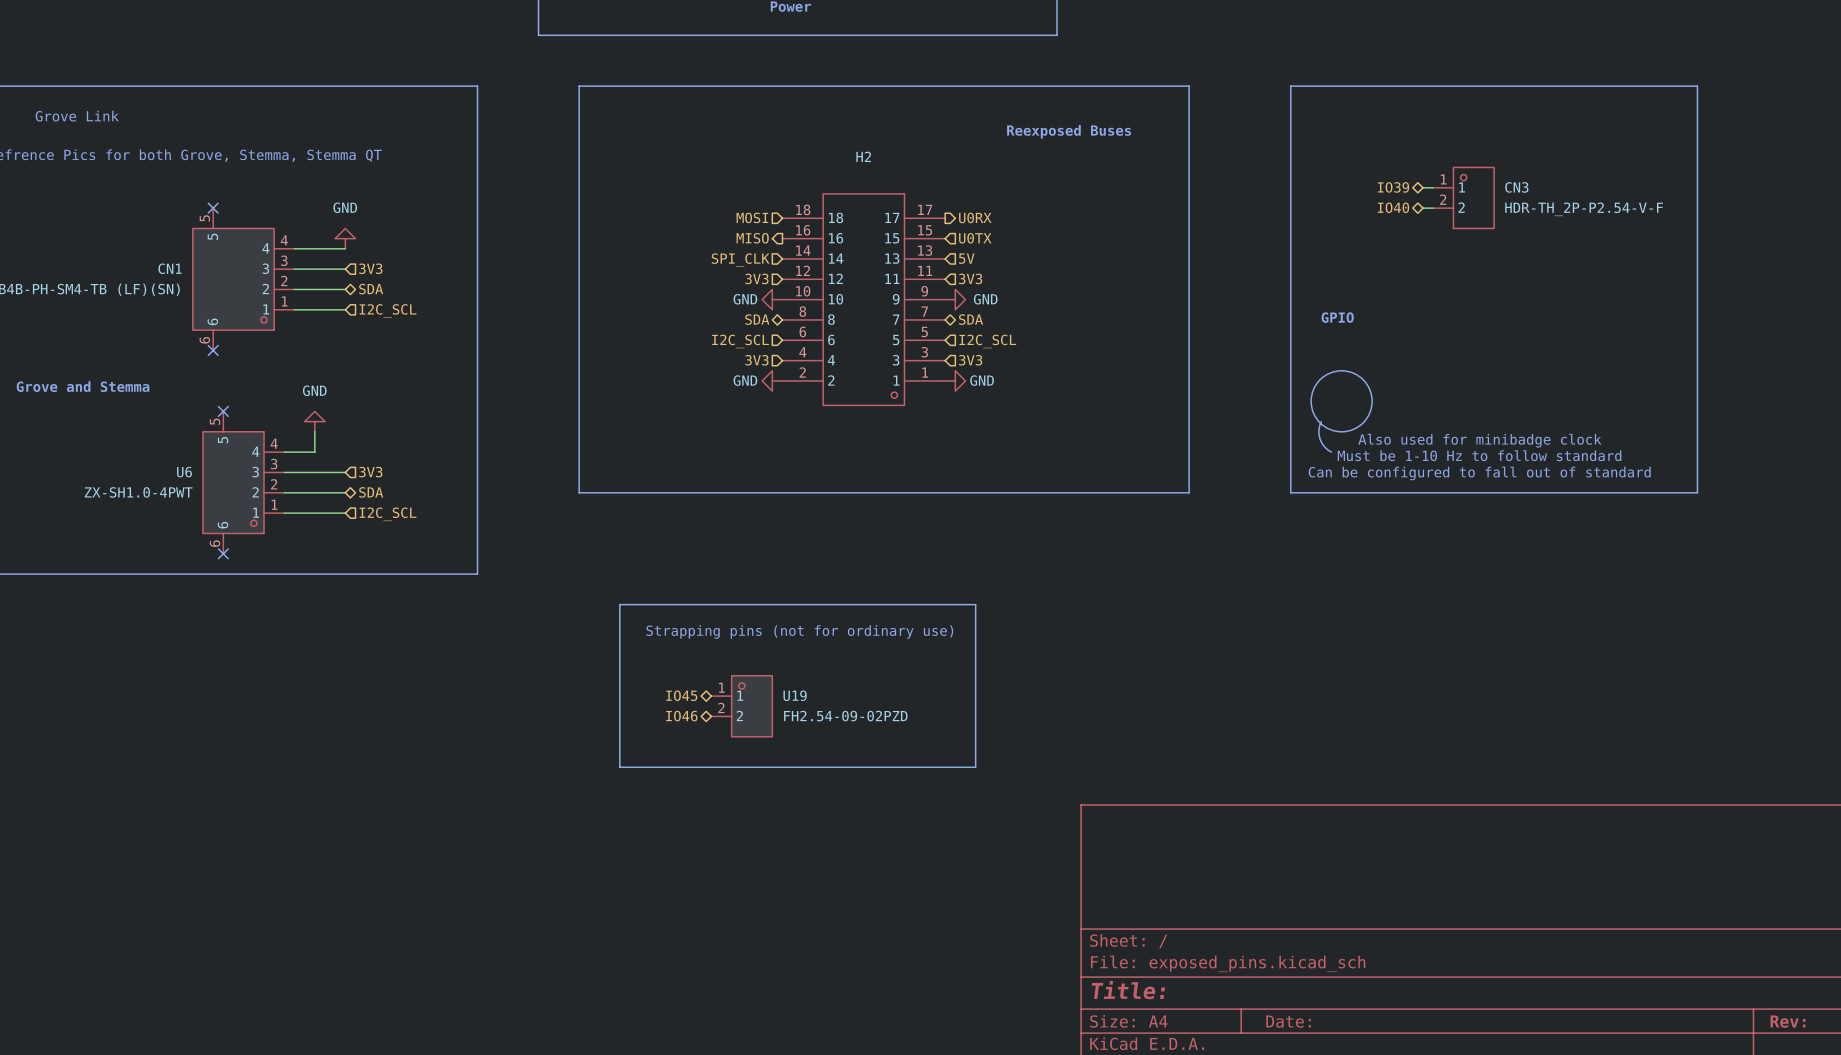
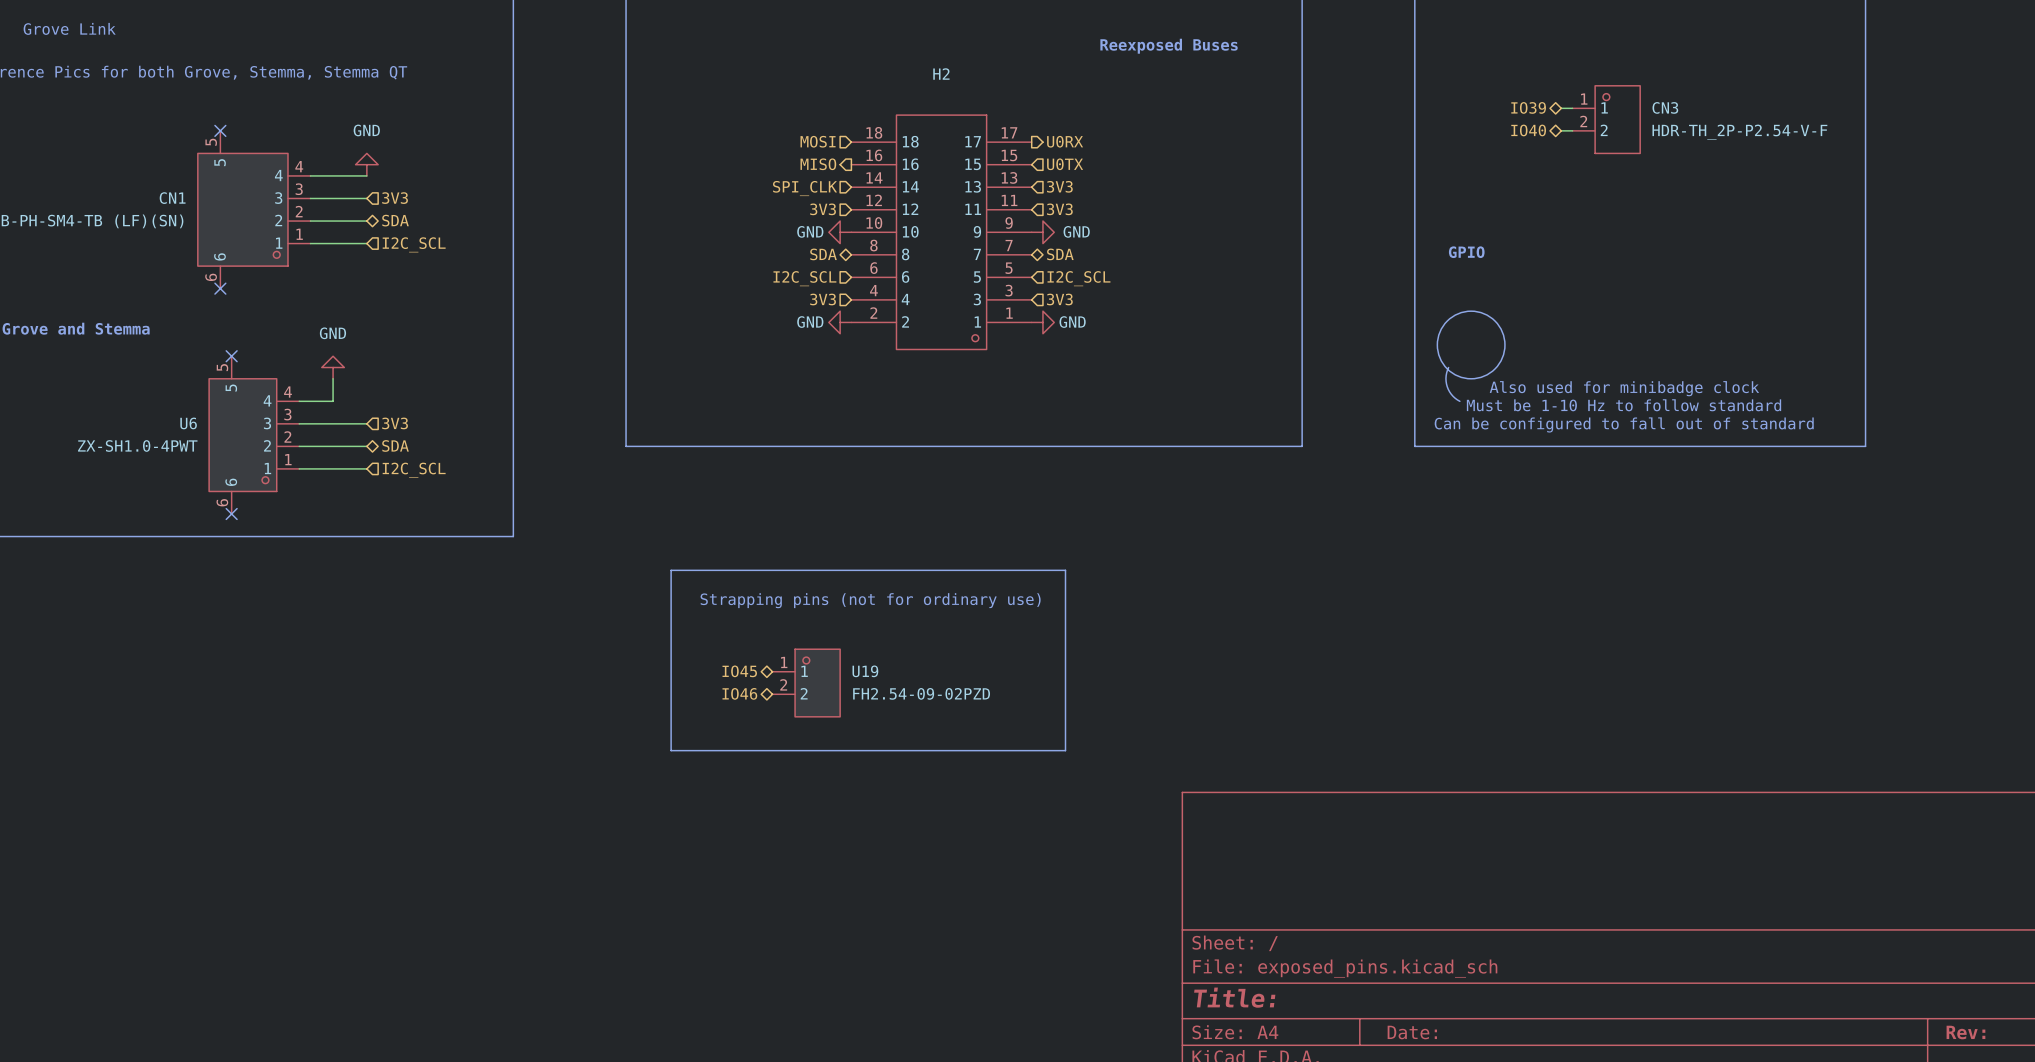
hierarchical label: 5V (966, 258) -> 3V3 (1059, 186)

